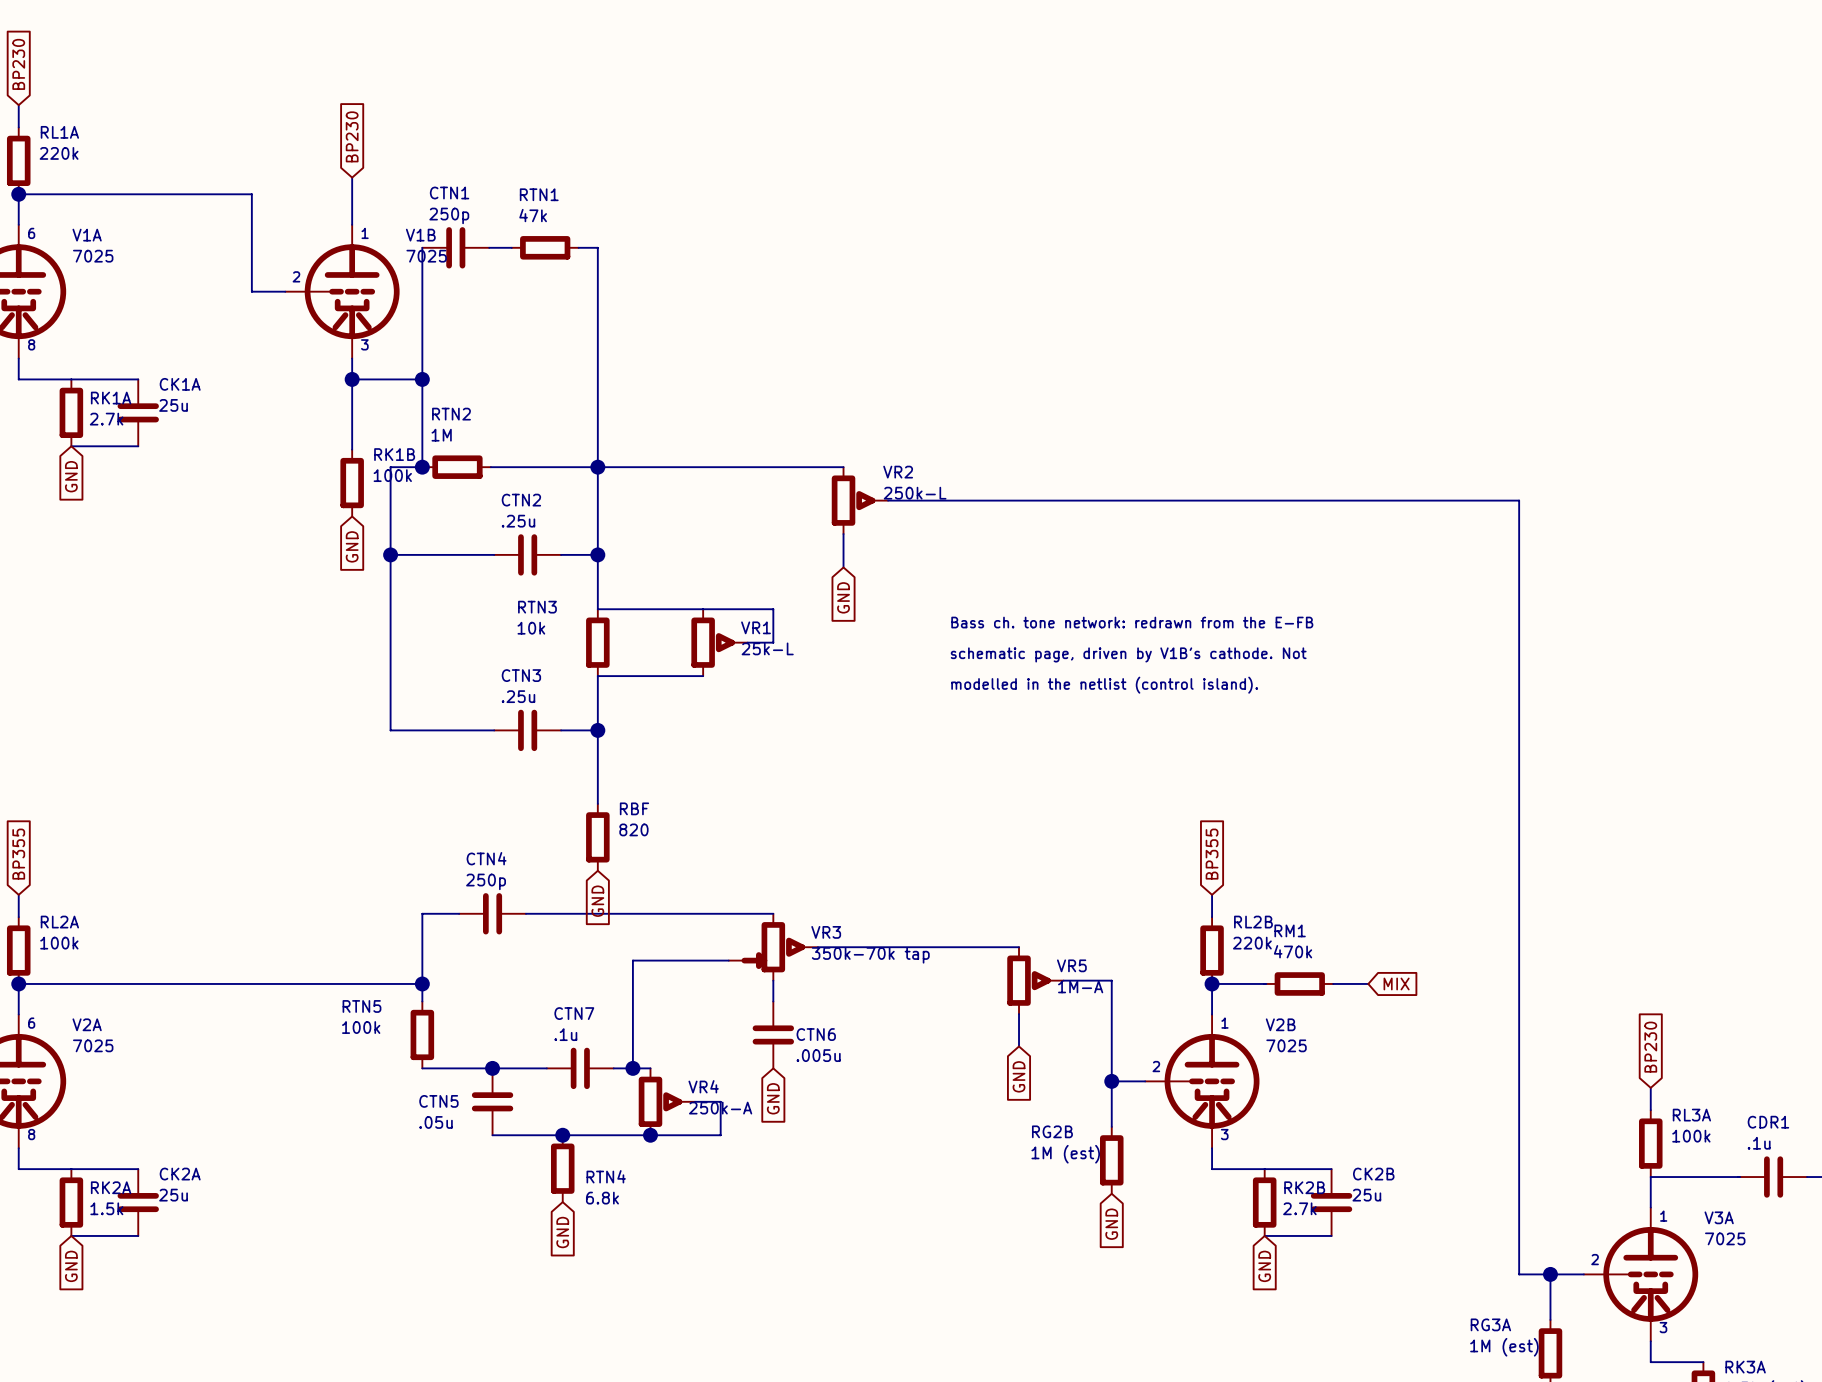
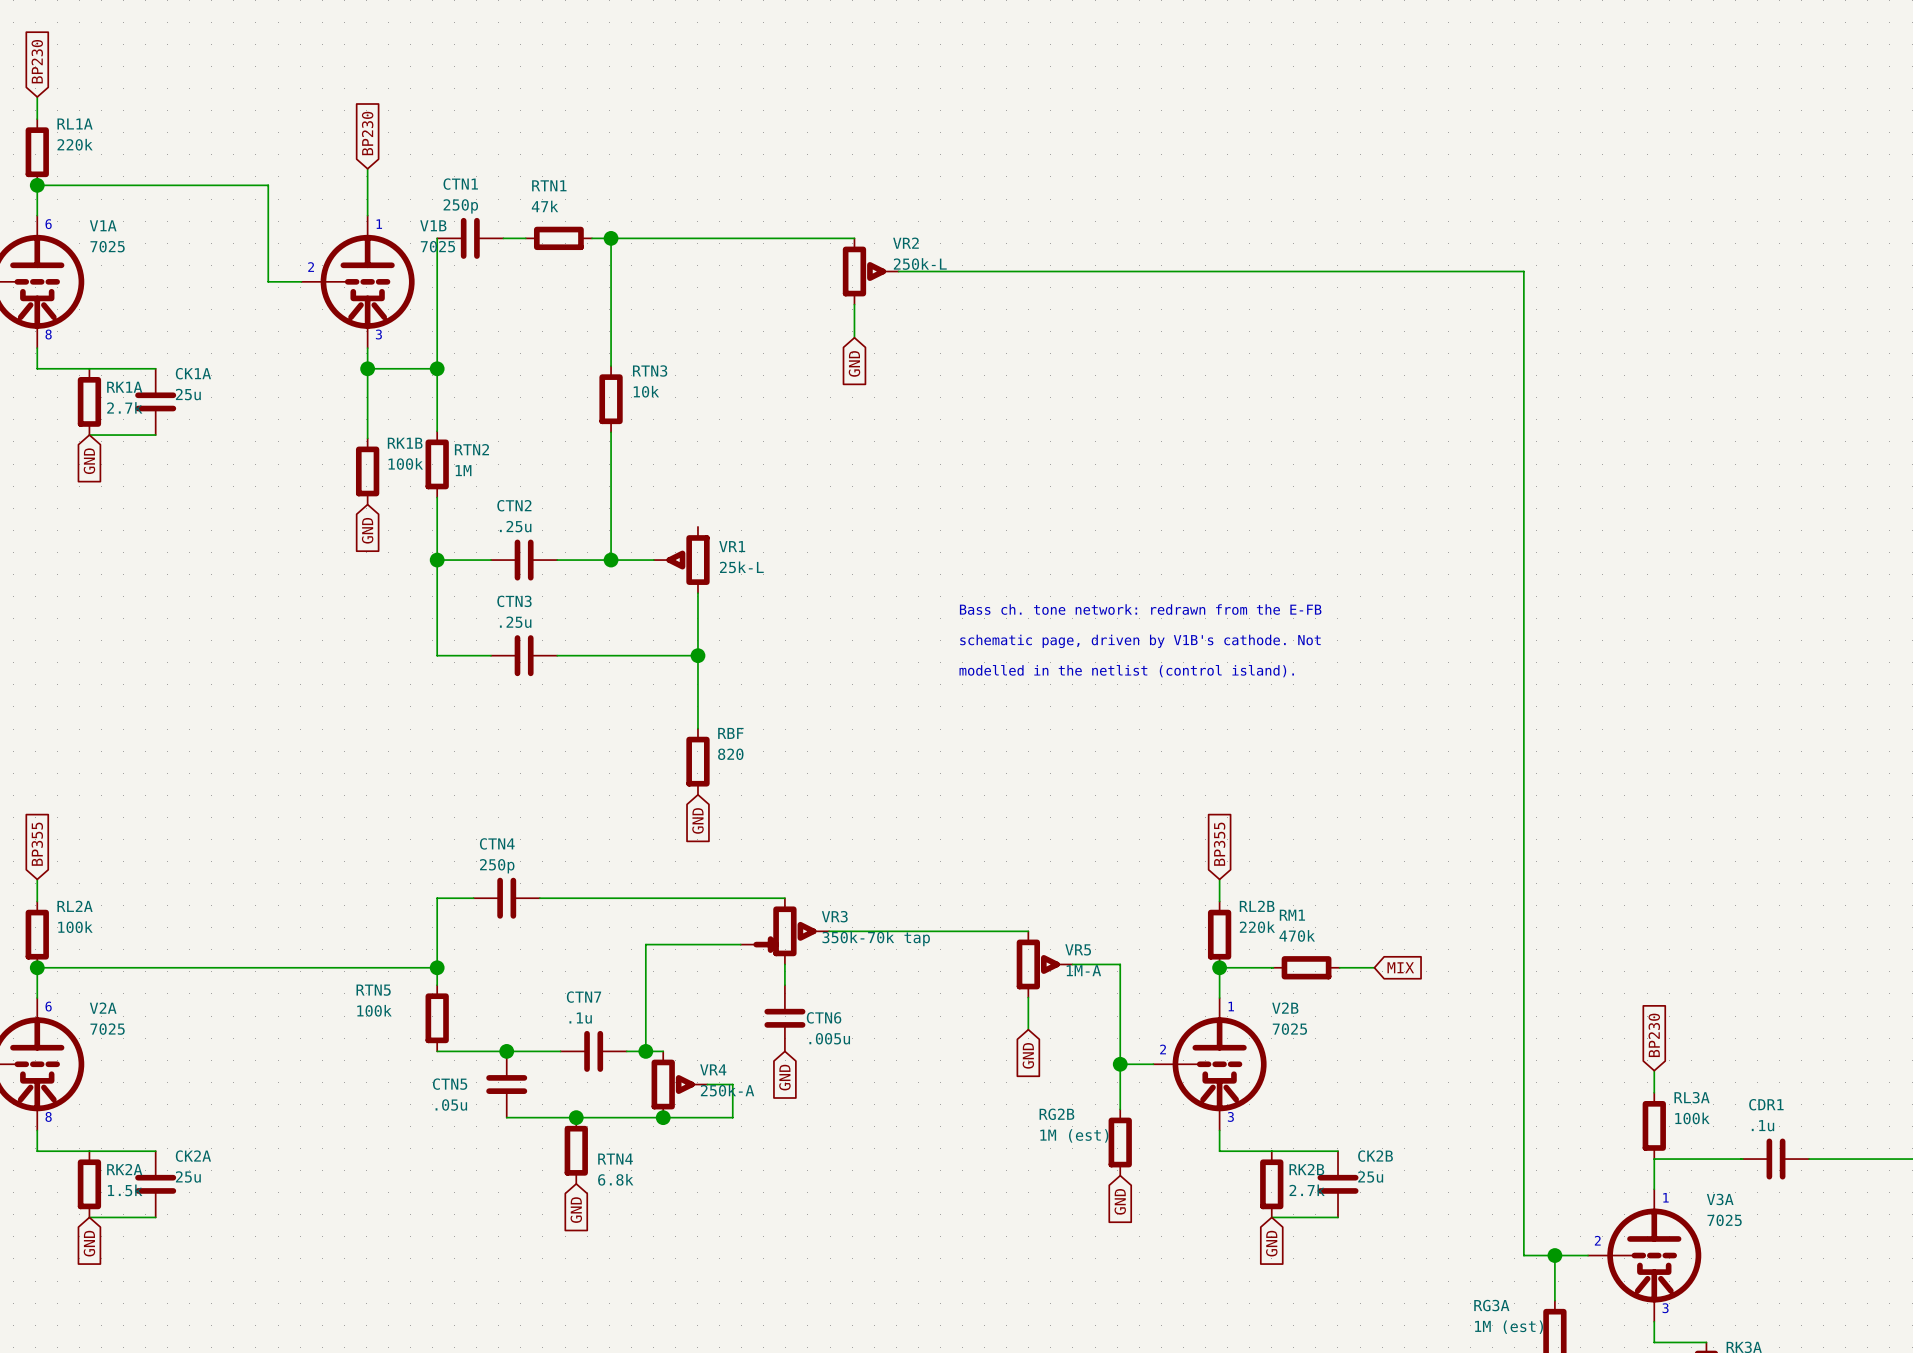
wire: none -> (611, 238) (854, 238)
junction: none -> (611, 238)
wire: none -> (854, 304) (854, 337)
wire: (597, 376) (597, 443) -> none
global label: none -> GND (854, 363)
RTN2 value position: 1M (441, 435) -> 1M (463, 470)
junction: (422, 467) -> none
wire: (424, 467) (390, 467) (390, 730) (494, 730) -> none
RTN2 rotation: 0° (457, 467) -> 90° clockwise (437, 464)
wire: (490, 467) (843, 467) -> none
junction: (597, 467) -> none
VR2 position: (859, 500) -> (870, 271)
wire: (888, 500) (1519, 500) -> (898, 271) (1523, 271) (1523, 488)
wire: none -> (437, 497) (437, 655) (490, 655)
wire: (843, 534) (843, 567) -> none
wire: (390, 554) (494, 554) -> none
junction position: (390, 554) -> (437, 560)
CTN2 position: (527, 554) -> (524, 560)
wire: (561, 554) (597, 554) -> none
junction position: (597, 554) -> (611, 560)
wire: none -> (437, 560) (490, 560)
wire: none -> (557, 560) (653, 560)
wire: (597, 572) (597, 609) (773, 609) (773, 642) (747, 642) -> none
global label: GND (843, 597) -> none
wire: none -> (697, 593) (697, 728)
RTN3 name position: RTN3 (537, 607) -> RTN3 (650, 370)
RTN3 value position: 10k (531, 628) -> 10k (646, 391)
RTN3 position: (597, 642) -> (611, 399)
VR1 rotation: 0° (713, 642) -> 180° (688, 560)
VR1 position: (719, 642) -> (681, 560)
wire: none -> (557, 655) (697, 655)
junction: none -> (697, 655)
wire: (703, 676) (597, 676) (597, 803) -> none
CTN3 position: (527, 730) -> (524, 655)
wire: (561, 730) (597, 730) -> none
junction: (597, 730) -> none
RBF position: (597, 837) -> (697, 761)
global label position: GND (597, 901) -> GND (697, 820)

